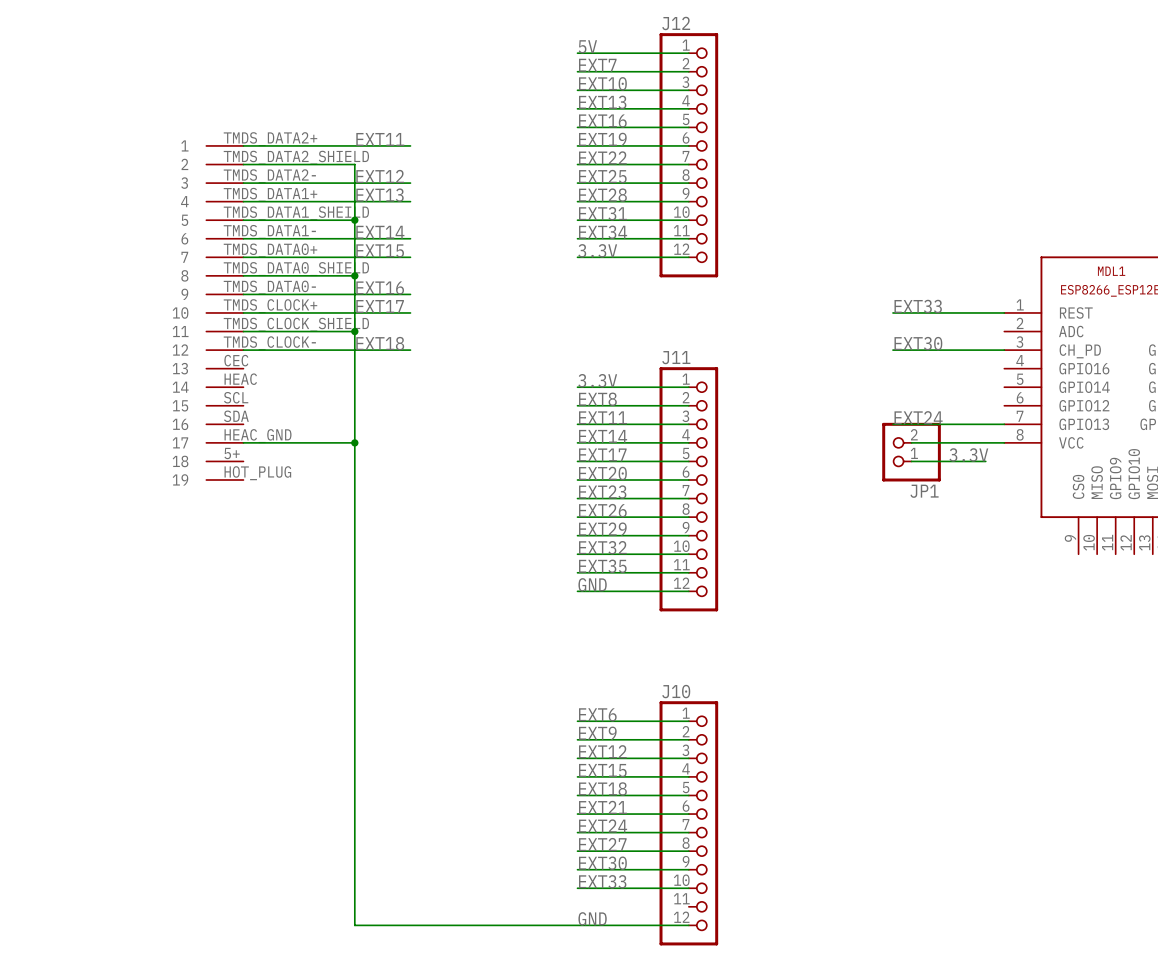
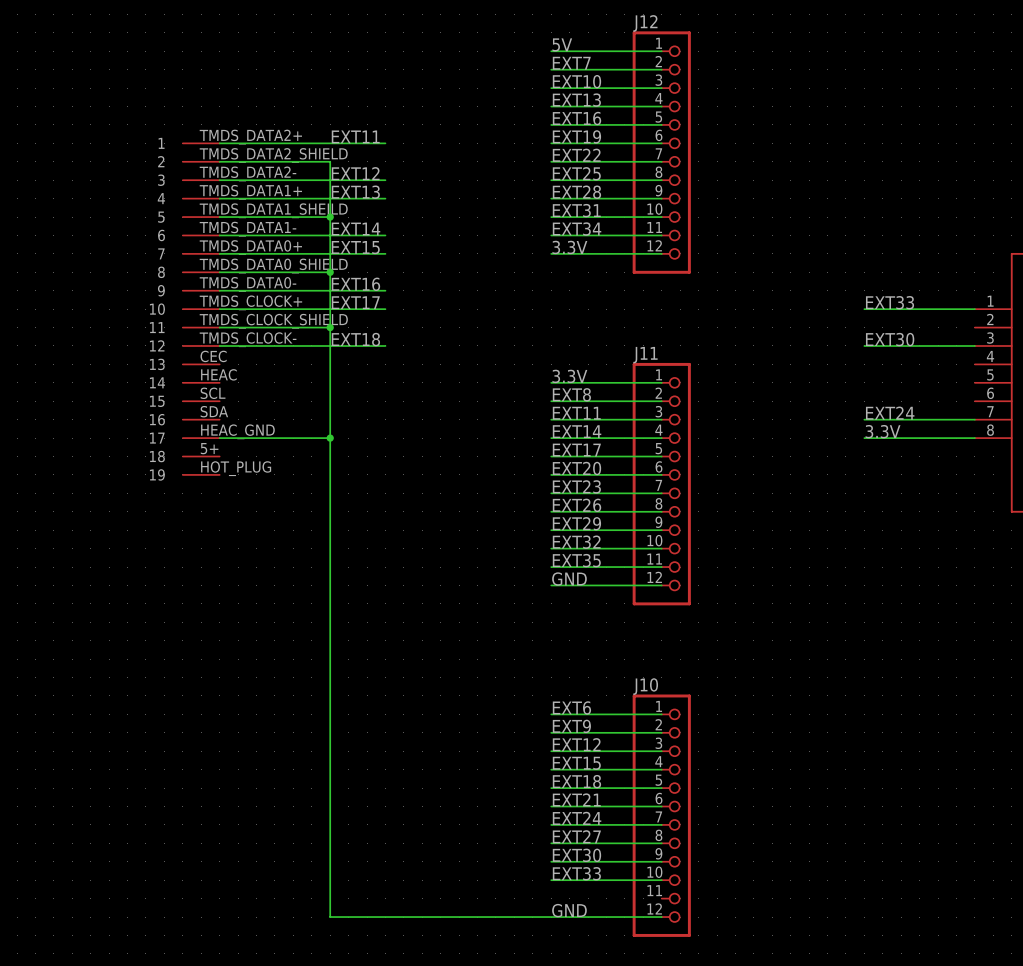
JP1: (911, 452) -> none
label position: 3.3V (968, 454) -> 3.3V (883, 431)
wire: (911, 461) (985, 461) -> none

